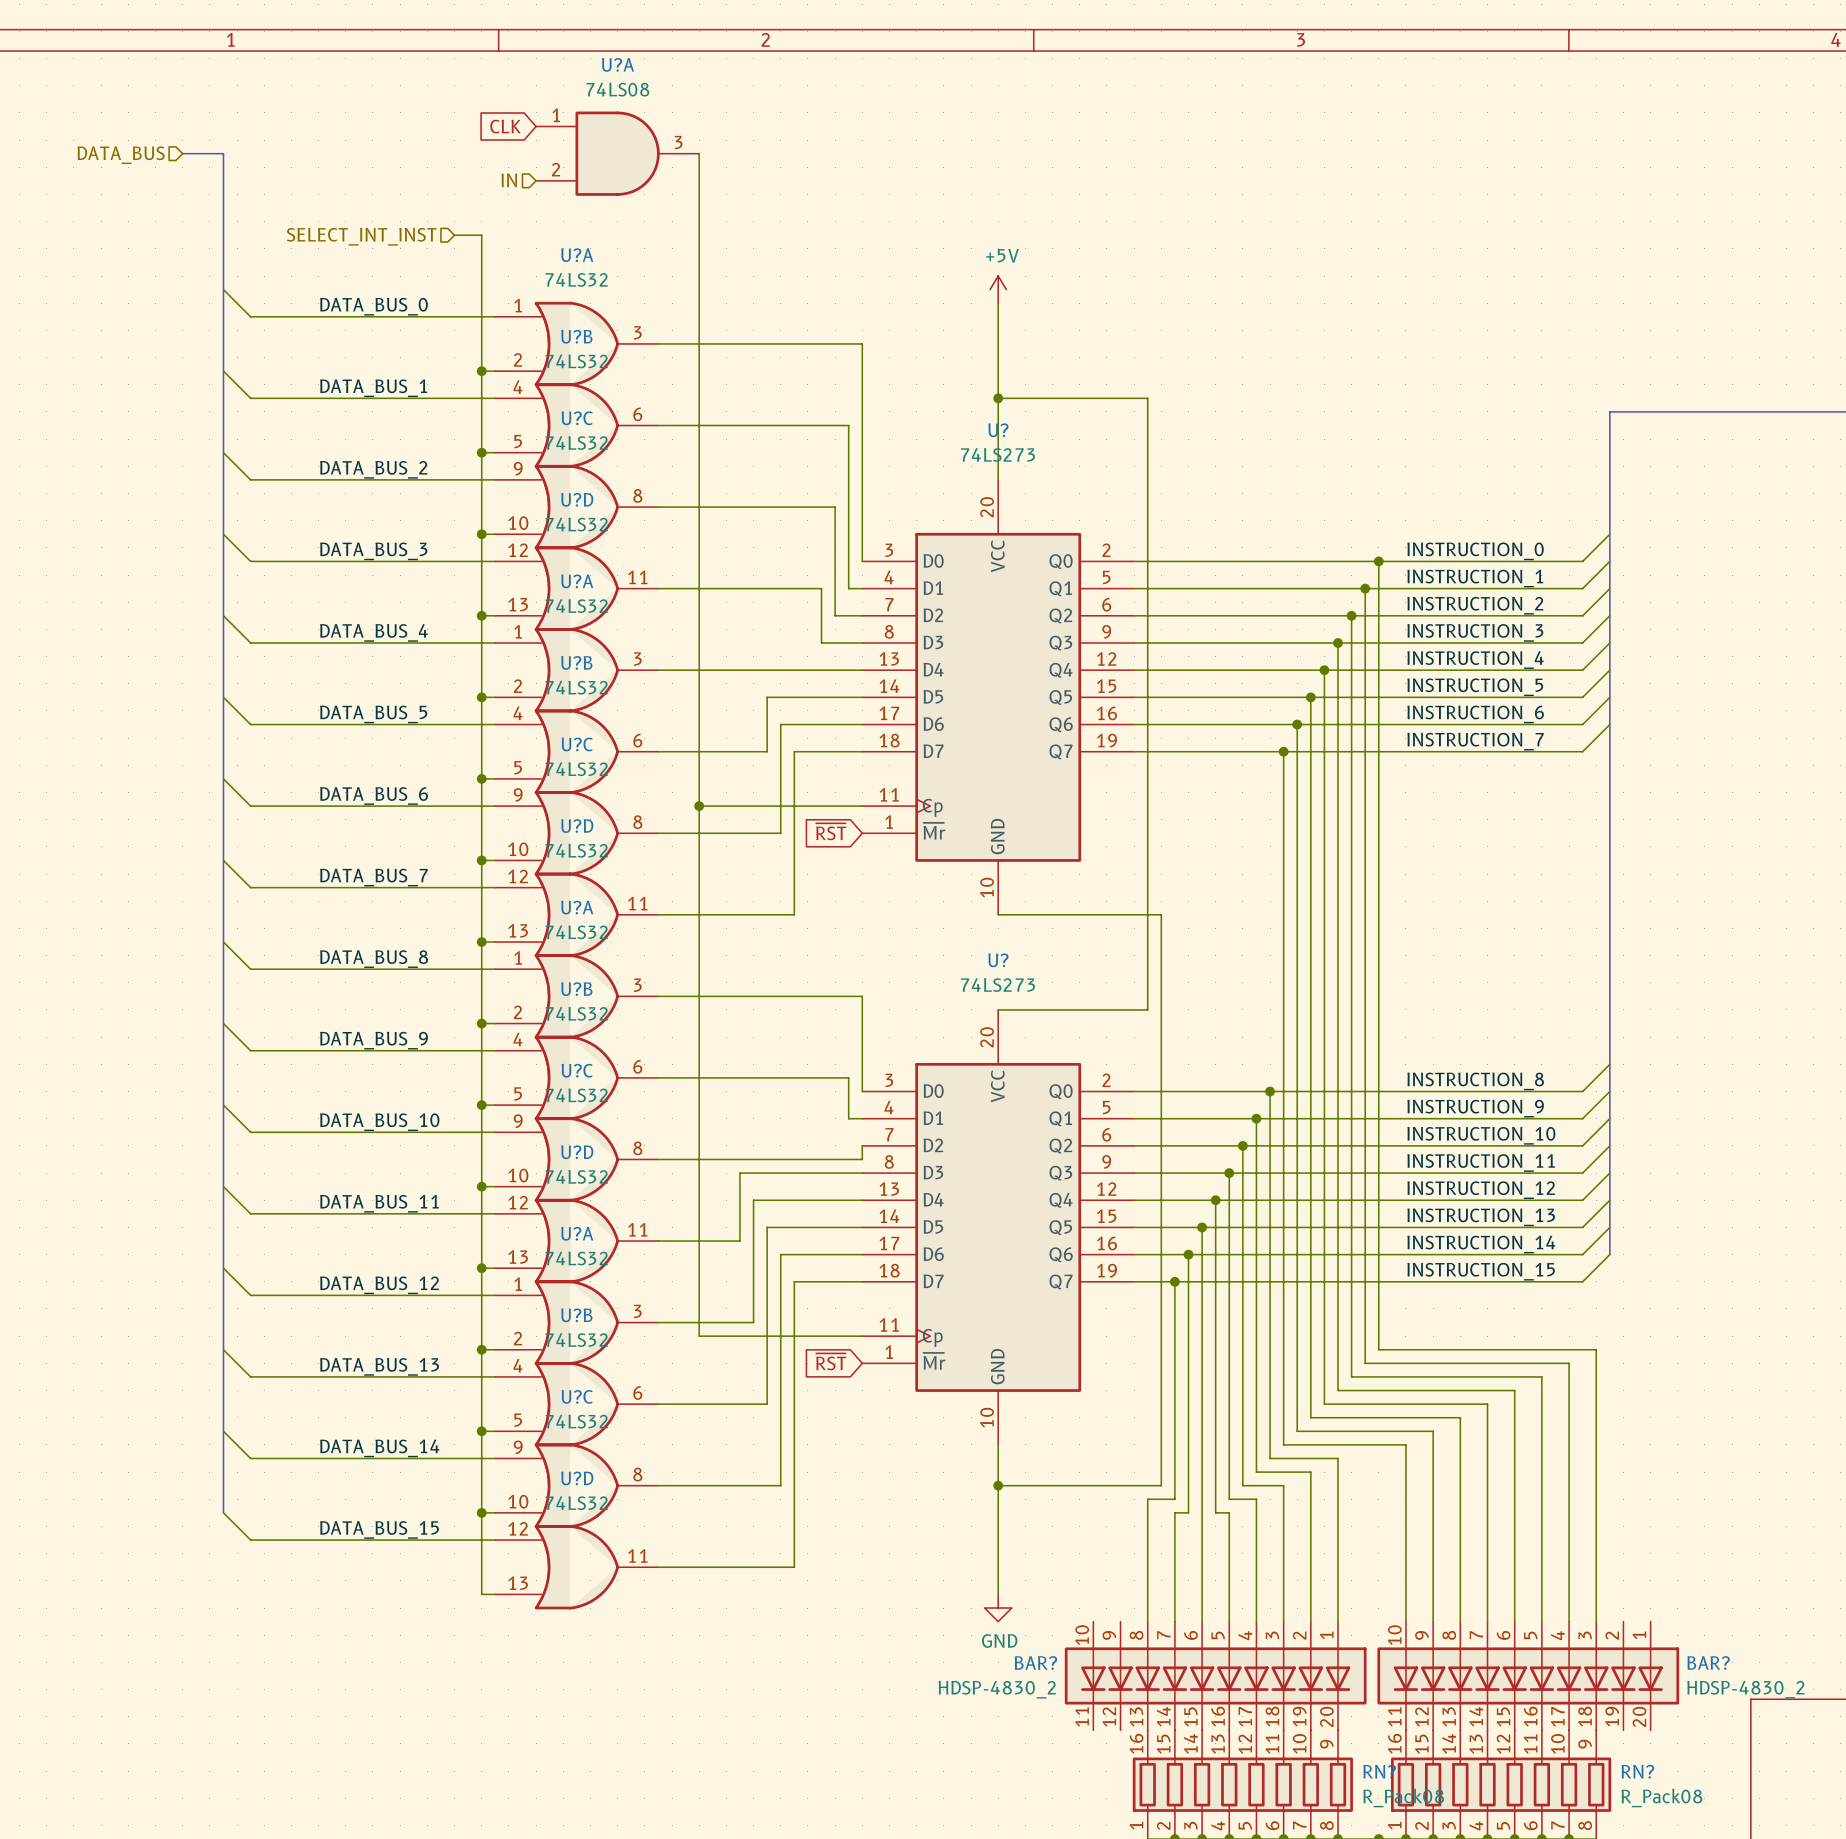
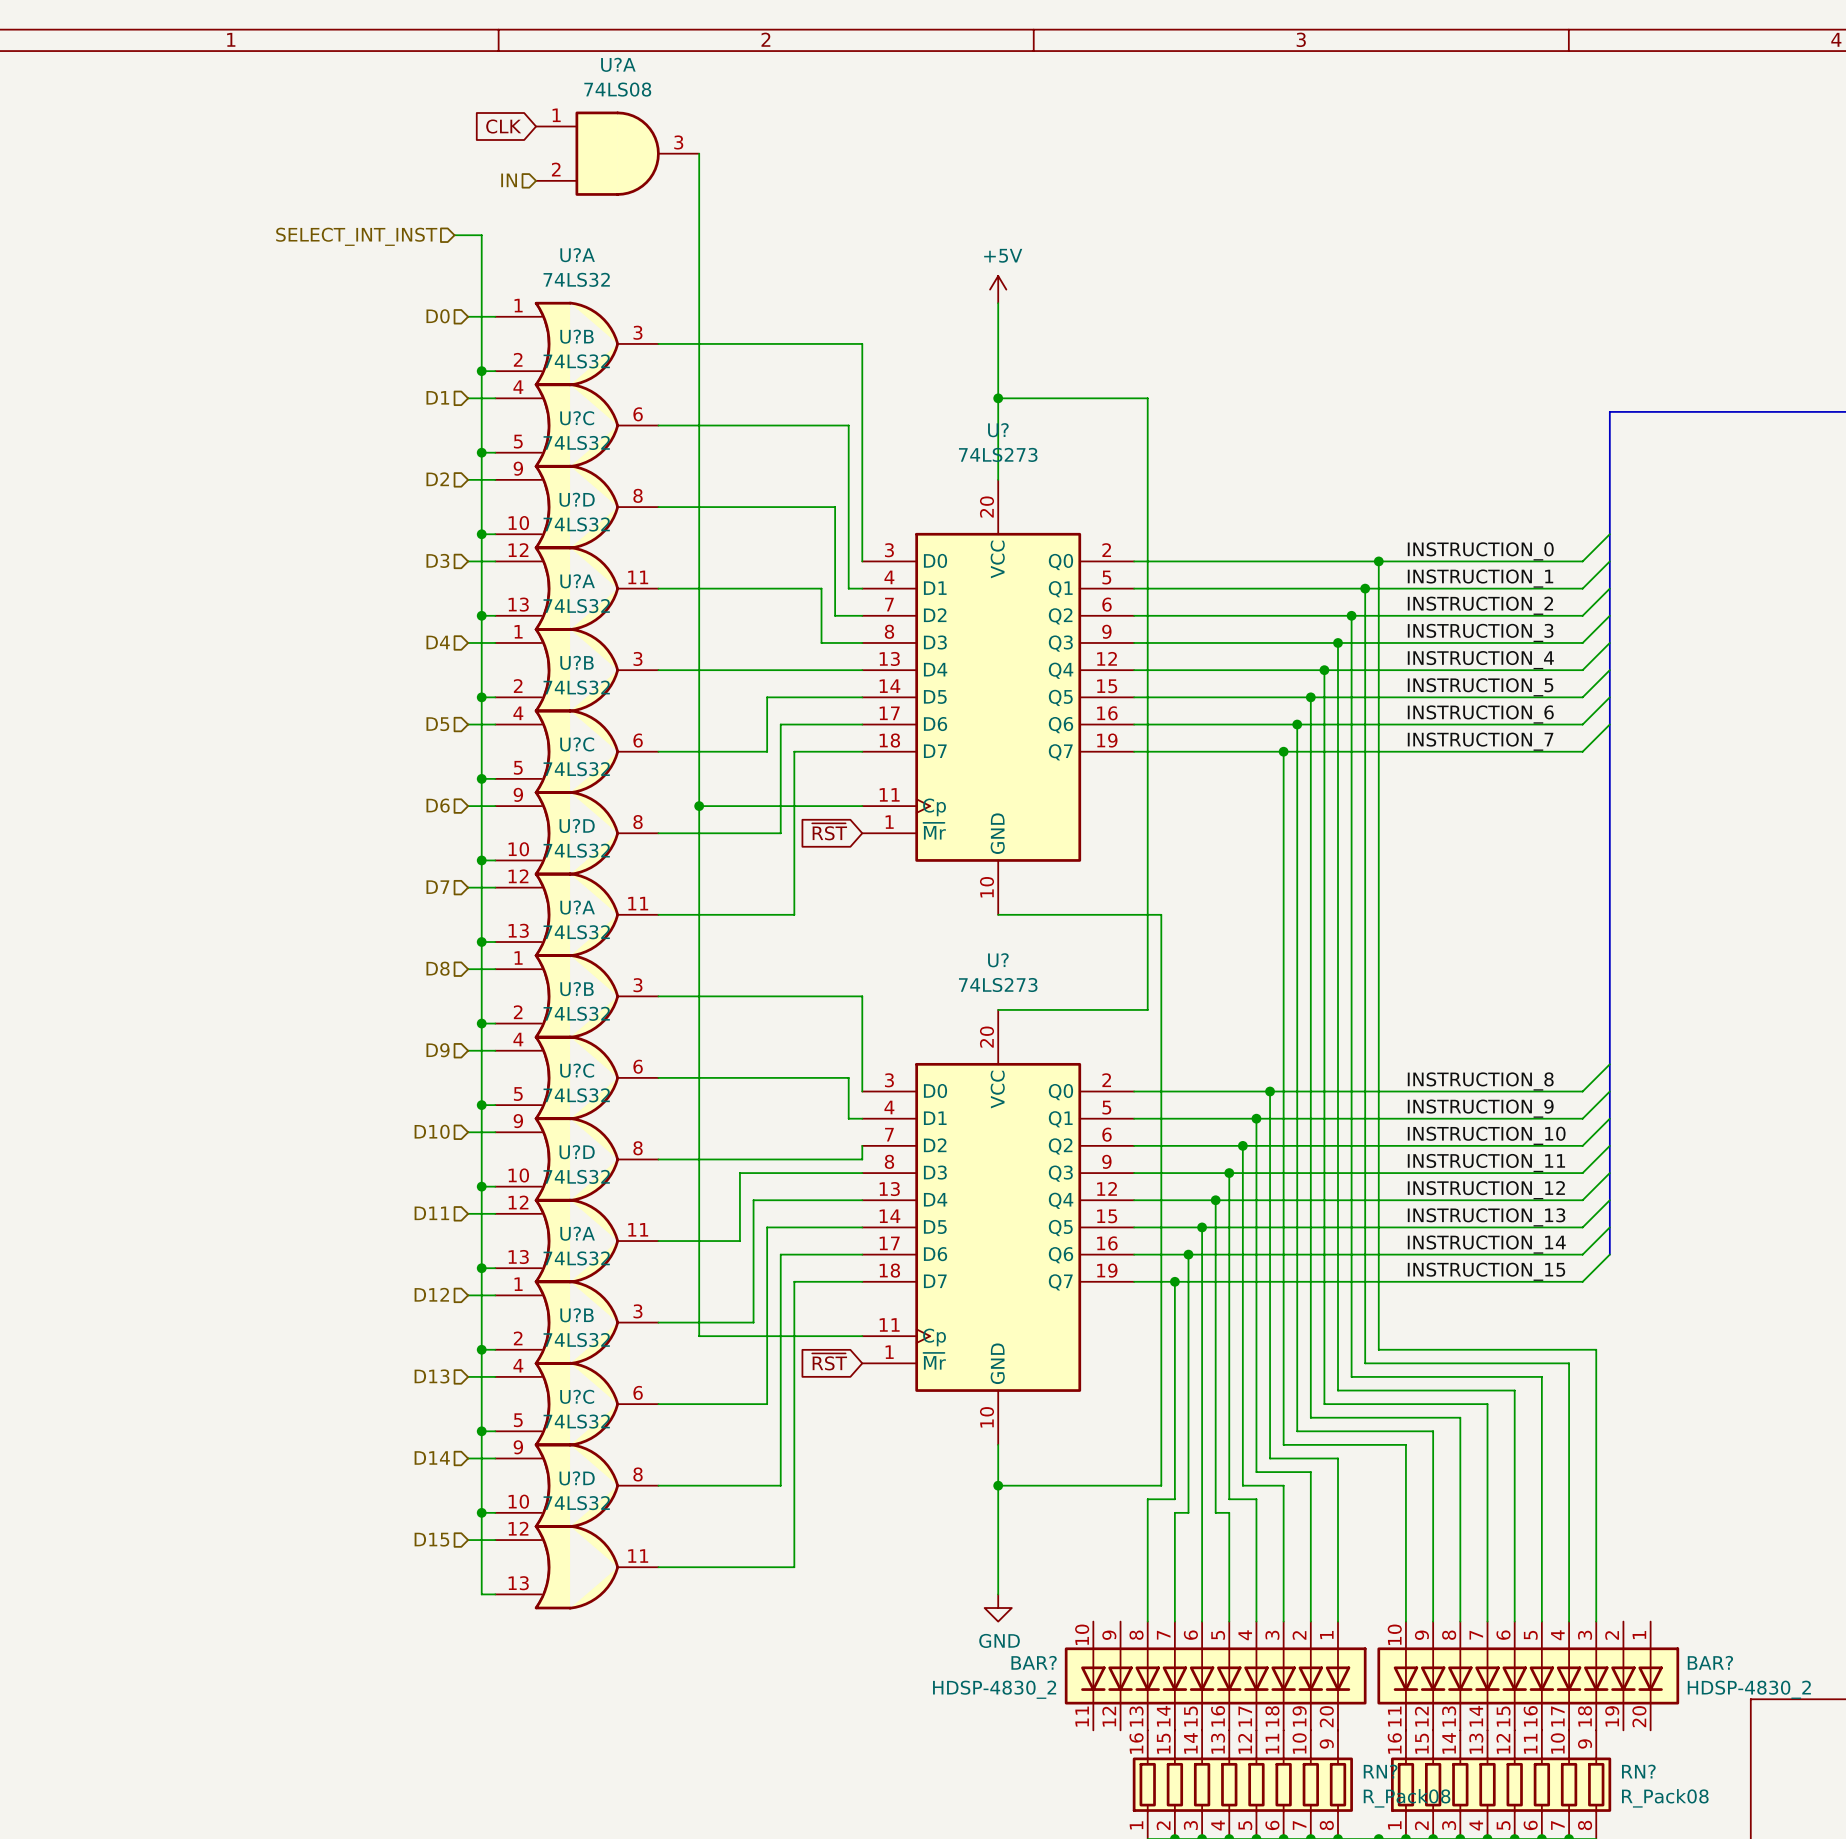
bus: (182, 153) (223, 153) (223, 1512) -> none
hierarchical label: DATA_BUS (121, 155) -> none
wire: (223, 289) (250, 316) (468, 316) -> none
label: DATA_BUS_0 (373, 306) -> none
hierarchical label: none -> D0 (438, 316)
wire: (223, 371) (250, 398) (468, 398) -> none
label: DATA_BUS_1 (373, 388) -> none
hierarchical label: none -> D1 (437, 397)
wire: (223, 452) (250, 479) (468, 479) -> none
label: DATA_BUS_2 (373, 469) -> none
hierarchical label: none -> D2 (437, 479)
wire: (223, 534) (250, 561) (468, 561) -> none
label: DATA_BUS_3 (373, 551) -> none
hierarchical label: none -> D3 (437, 560)
wire: (223, 615) (250, 642) (468, 642) -> none
label: DATA_BUS_4 (373, 632) -> none
hierarchical label: none -> D4 (438, 642)
wire: (223, 697) (250, 724) (468, 724) -> none
label: DATA_BUS_5 (373, 714) -> none
hierarchical label: none -> D5 (437, 724)
wire: (223, 778) (250, 806) (468, 806) -> none
label: DATA_BUS_6 (374, 795) -> none
hierarchical label: none -> D6 (438, 805)
wire: (223, 860) (250, 887) (468, 887) -> none
label: DATA_BUS_7 (373, 877) -> none
hierarchical label: none -> D7 (437, 887)
wire: (223, 942) (250, 969) (468, 969) -> none
label: DATA_BUS_8 (374, 959) -> none
hierarchical label: none -> D8 (438, 968)
wire: (223, 1023) (250, 1050) (468, 1050) -> none
label: DATA_BUS_9 (374, 1040) -> none
hierarchical label: none -> D9 (438, 1050)
wire: (223, 1105) (250, 1132) (468, 1132) -> none
label: DATA_BUS_10 (379, 1122) -> none
hierarchical label: none -> D10 (432, 1131)
wire: (223, 1186) (250, 1213) (468, 1213) -> none
label: DATA_BUS_11 (379, 1203) -> none
hierarchical label: none -> D11 (431, 1213)
wire: (223, 1268) (250, 1295) (468, 1295) -> none
label: DATA_BUS_12 (379, 1285) -> none
hierarchical label: none -> D12 (431, 1294)
wire: (223, 1349) (250, 1376) (468, 1376) -> none
label: DATA_BUS_13 (379, 1366) -> none
hierarchical label: none -> D13 (431, 1376)
wire: (223, 1431) (250, 1458) (468, 1458) -> none
label: DATA_BUS_14 (379, 1448) -> none
hierarchical label: none -> D14 (432, 1457)
wire: (223, 1512) (250, 1540) (468, 1540) -> none
label: DATA_BUS_15 (379, 1529) -> none
hierarchical label: none -> D15 (431, 1539)

